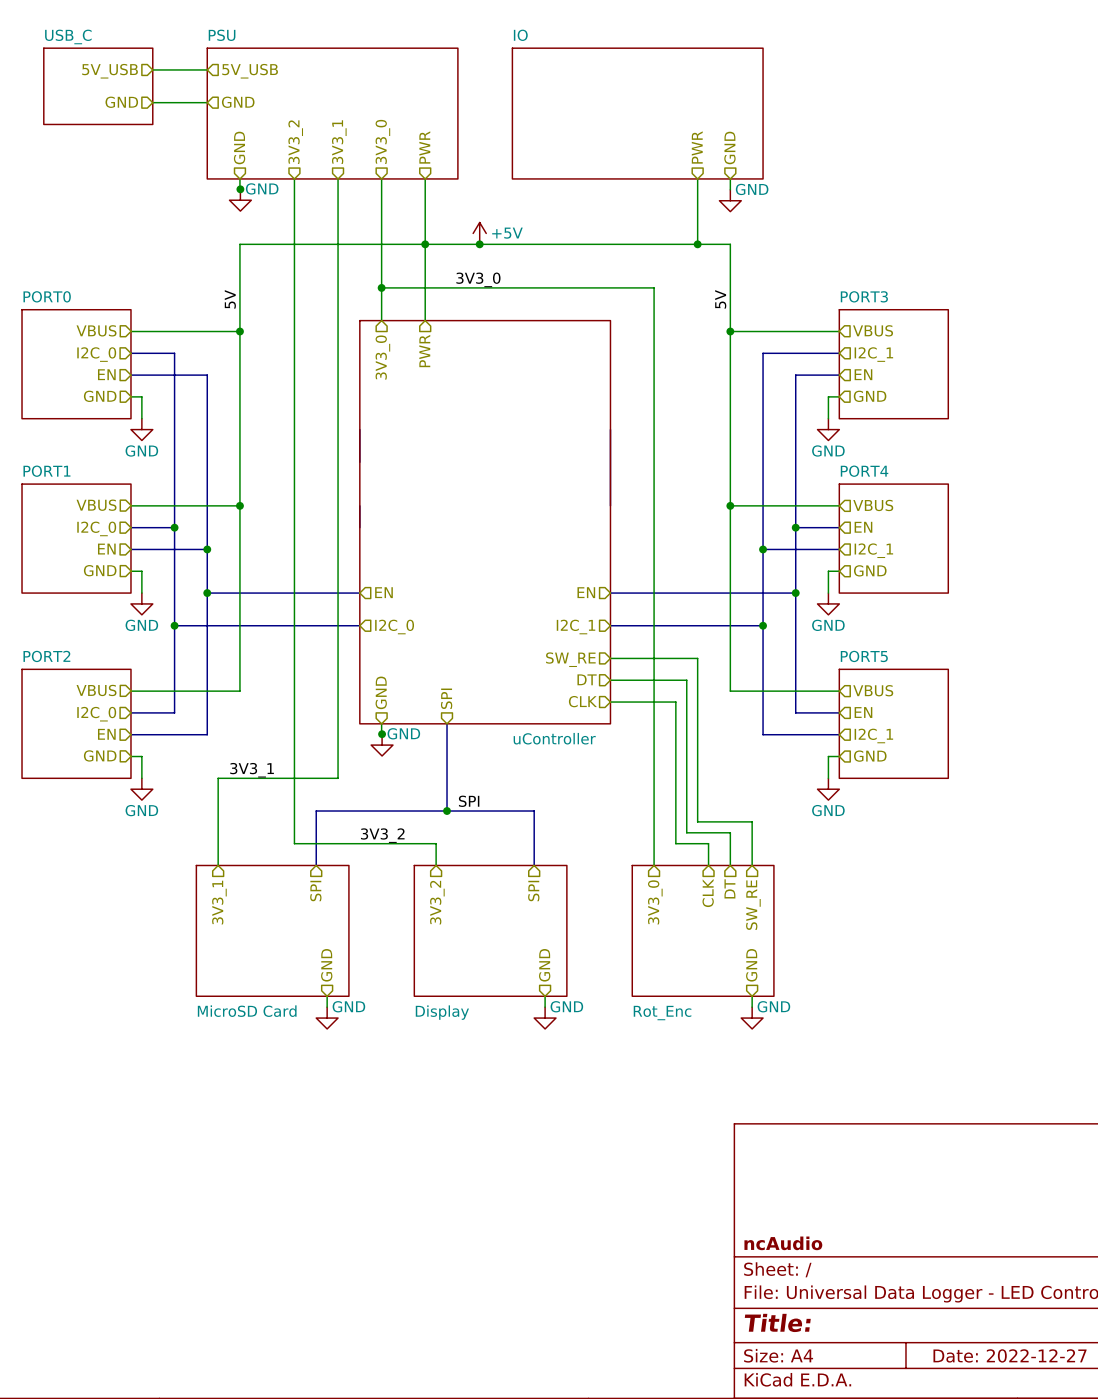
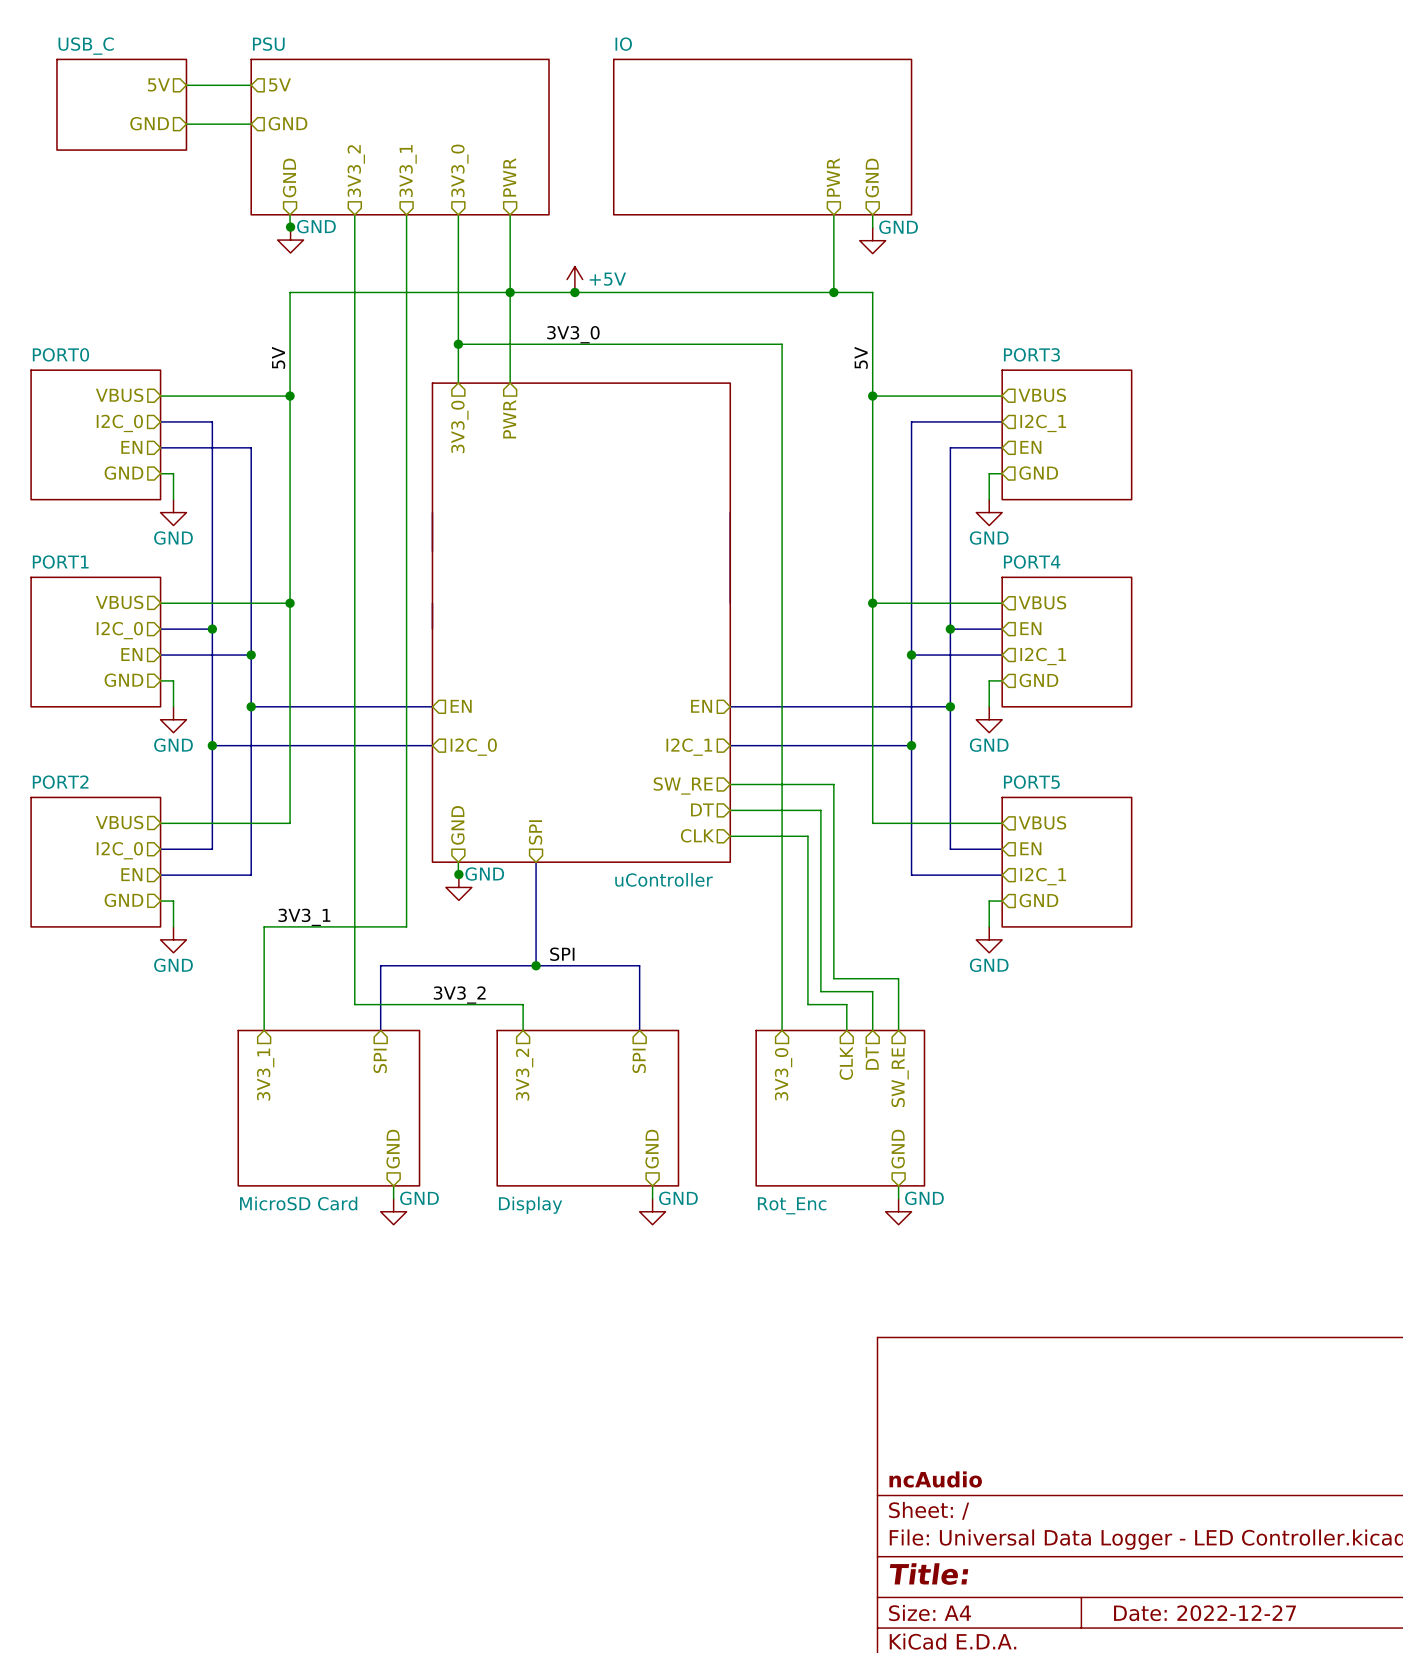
hierarchical label: 5V_USB (110, 71) -> 5V (158, 84)
hierarchical label: 5V_USB (250, 71) -> 5V (279, 84)

